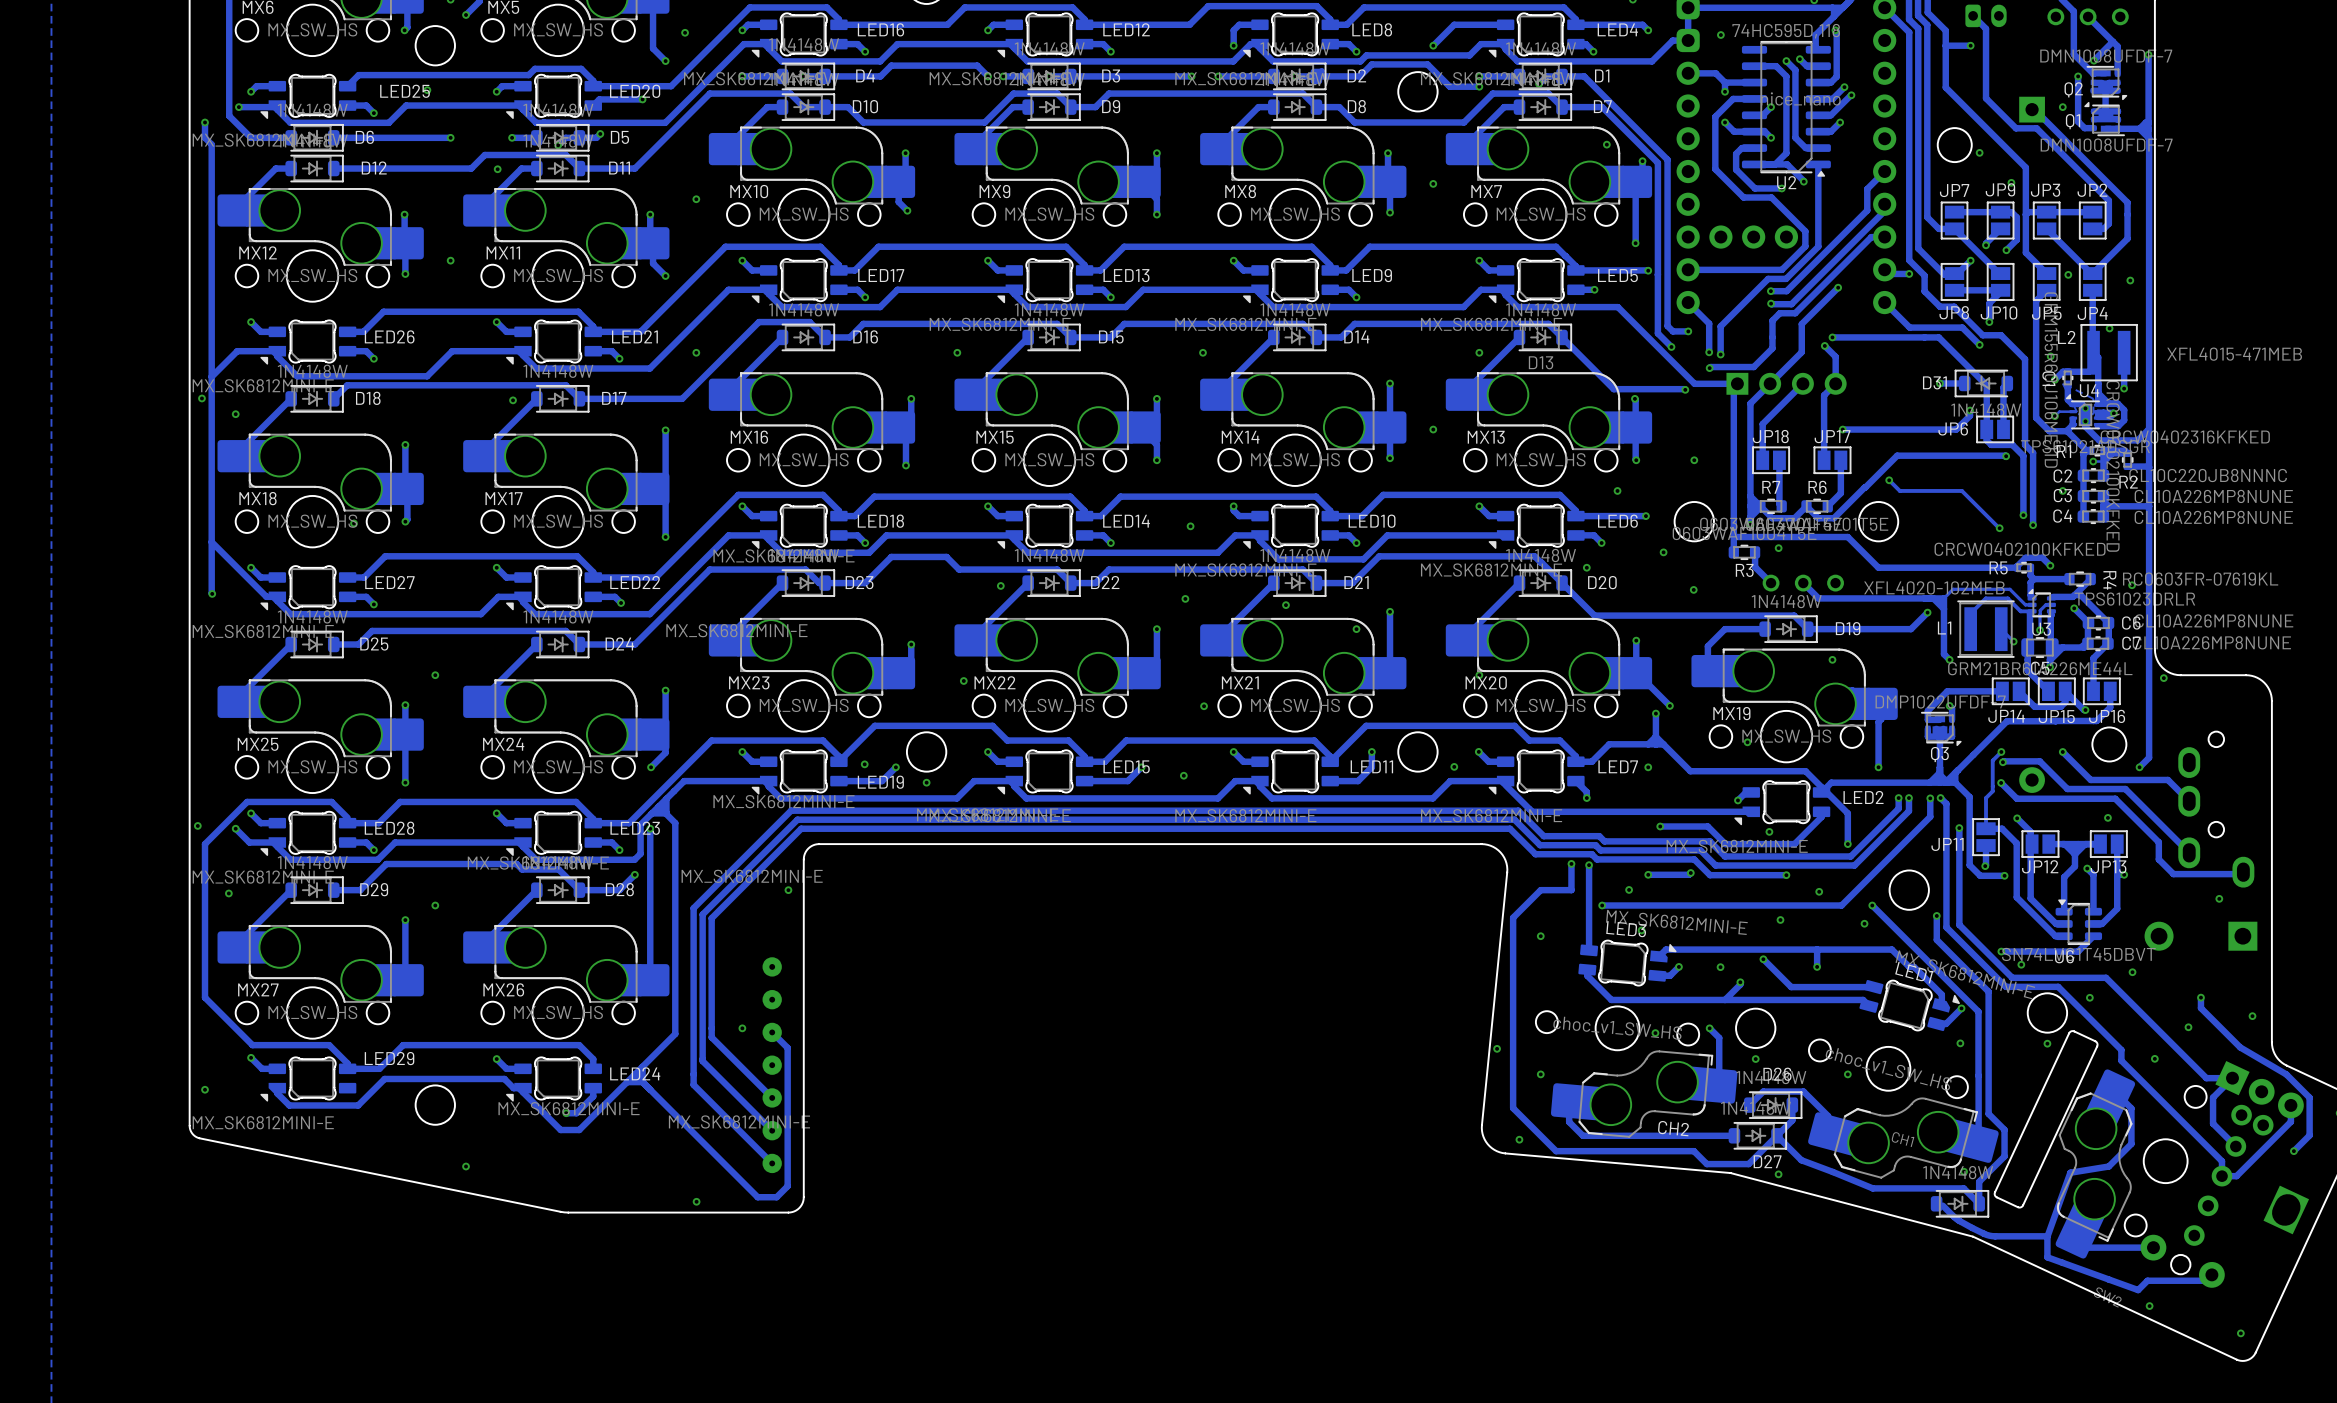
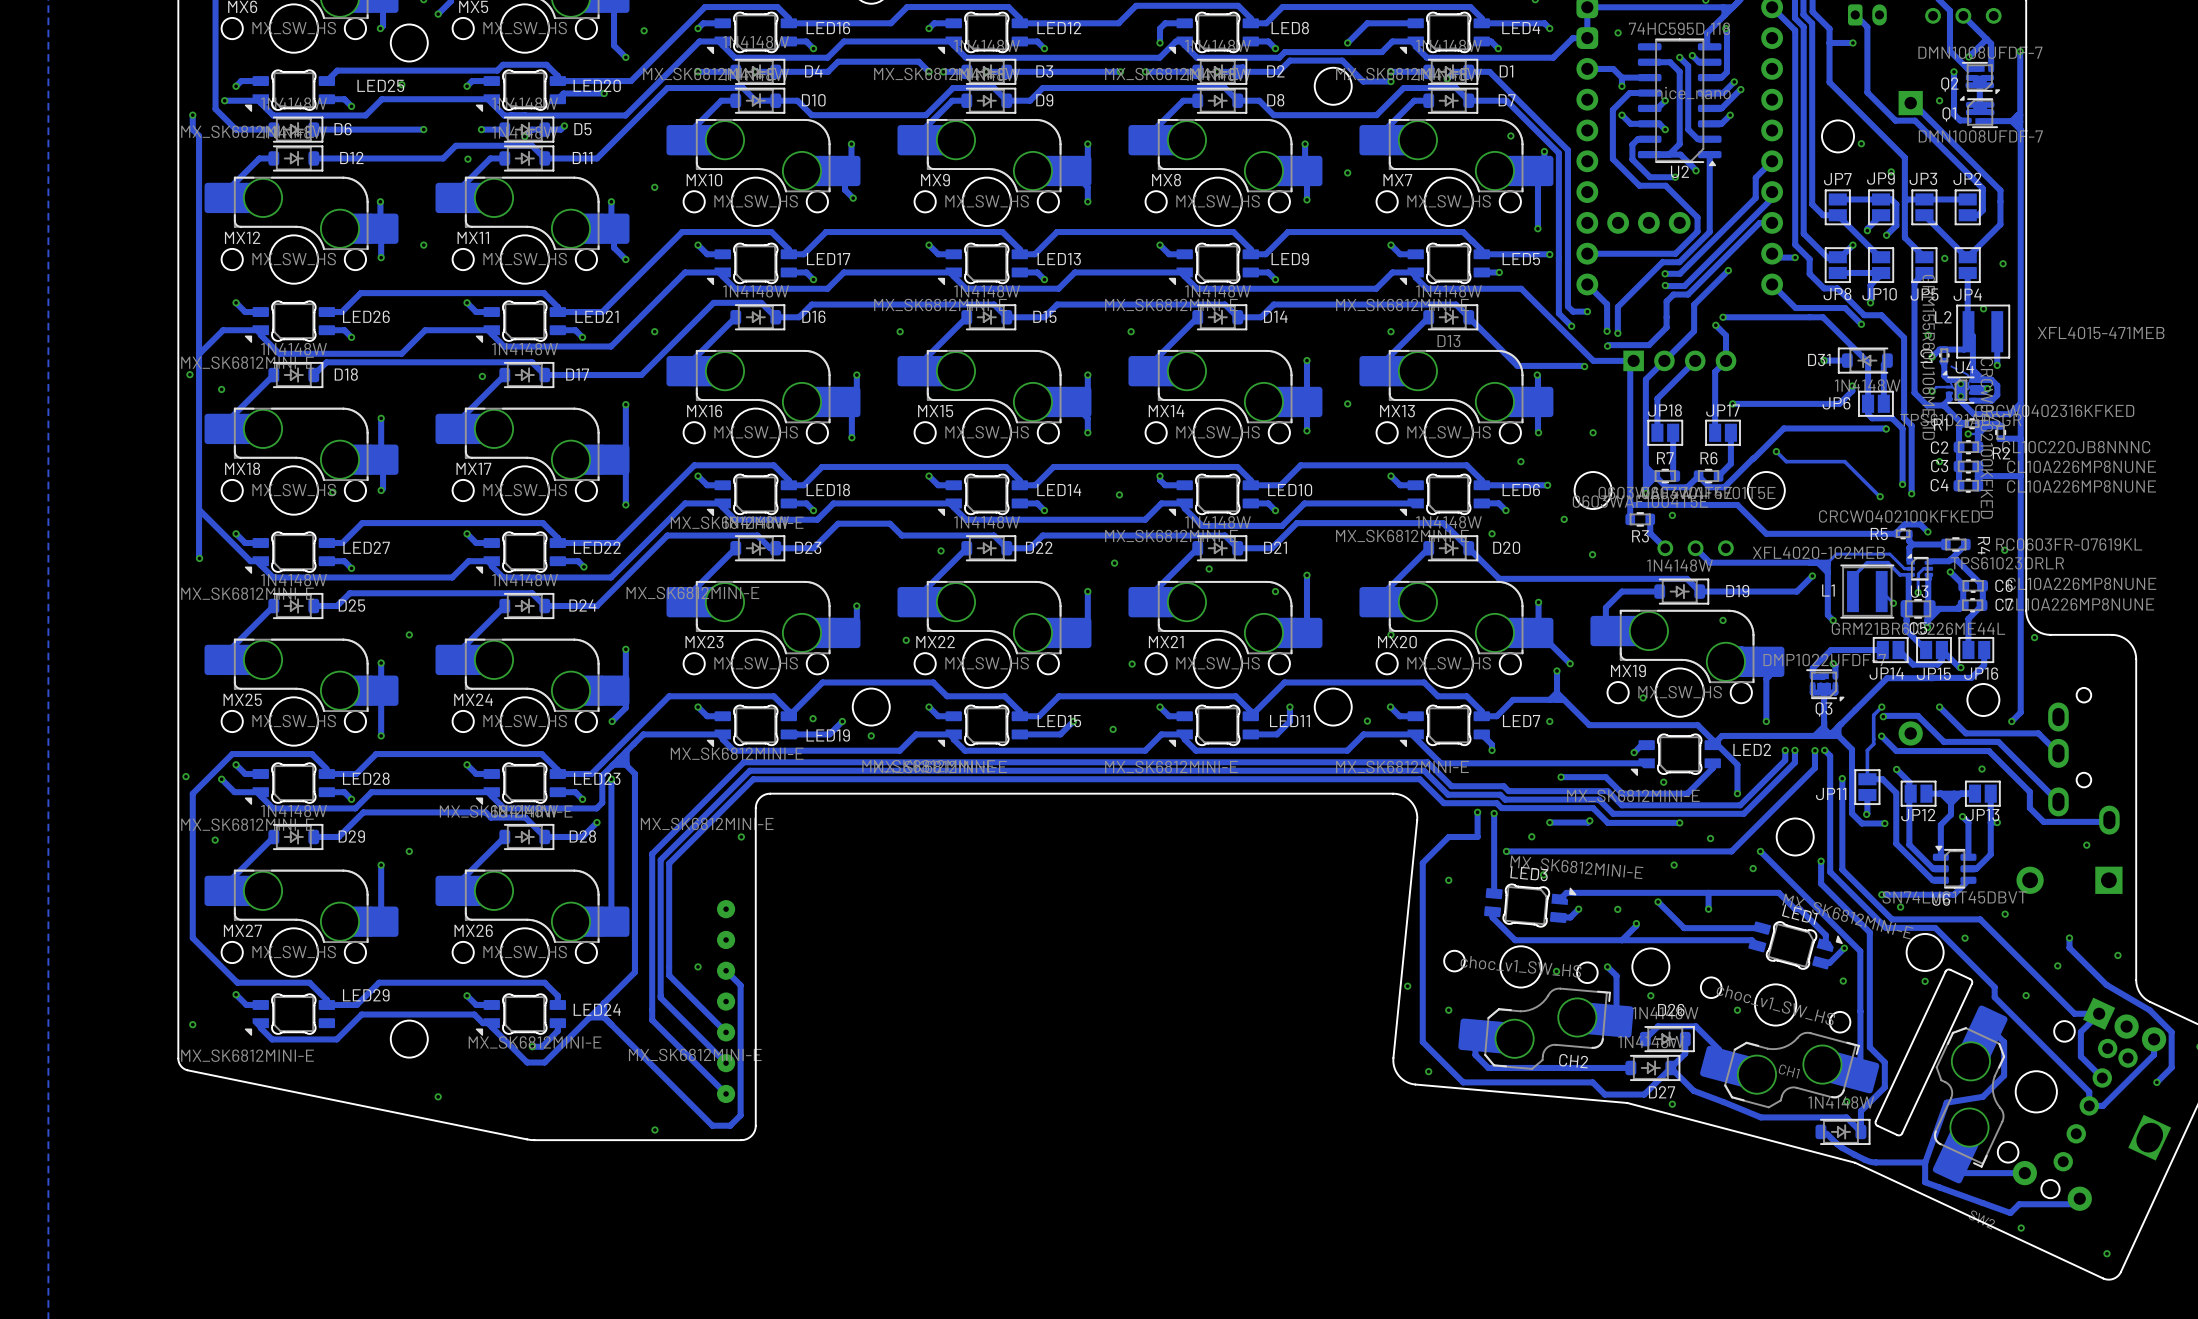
C5 value: GRM21BR61A226ME44L (2040, 668) -> GRM21BR61C226ME44L (1918, 628)

